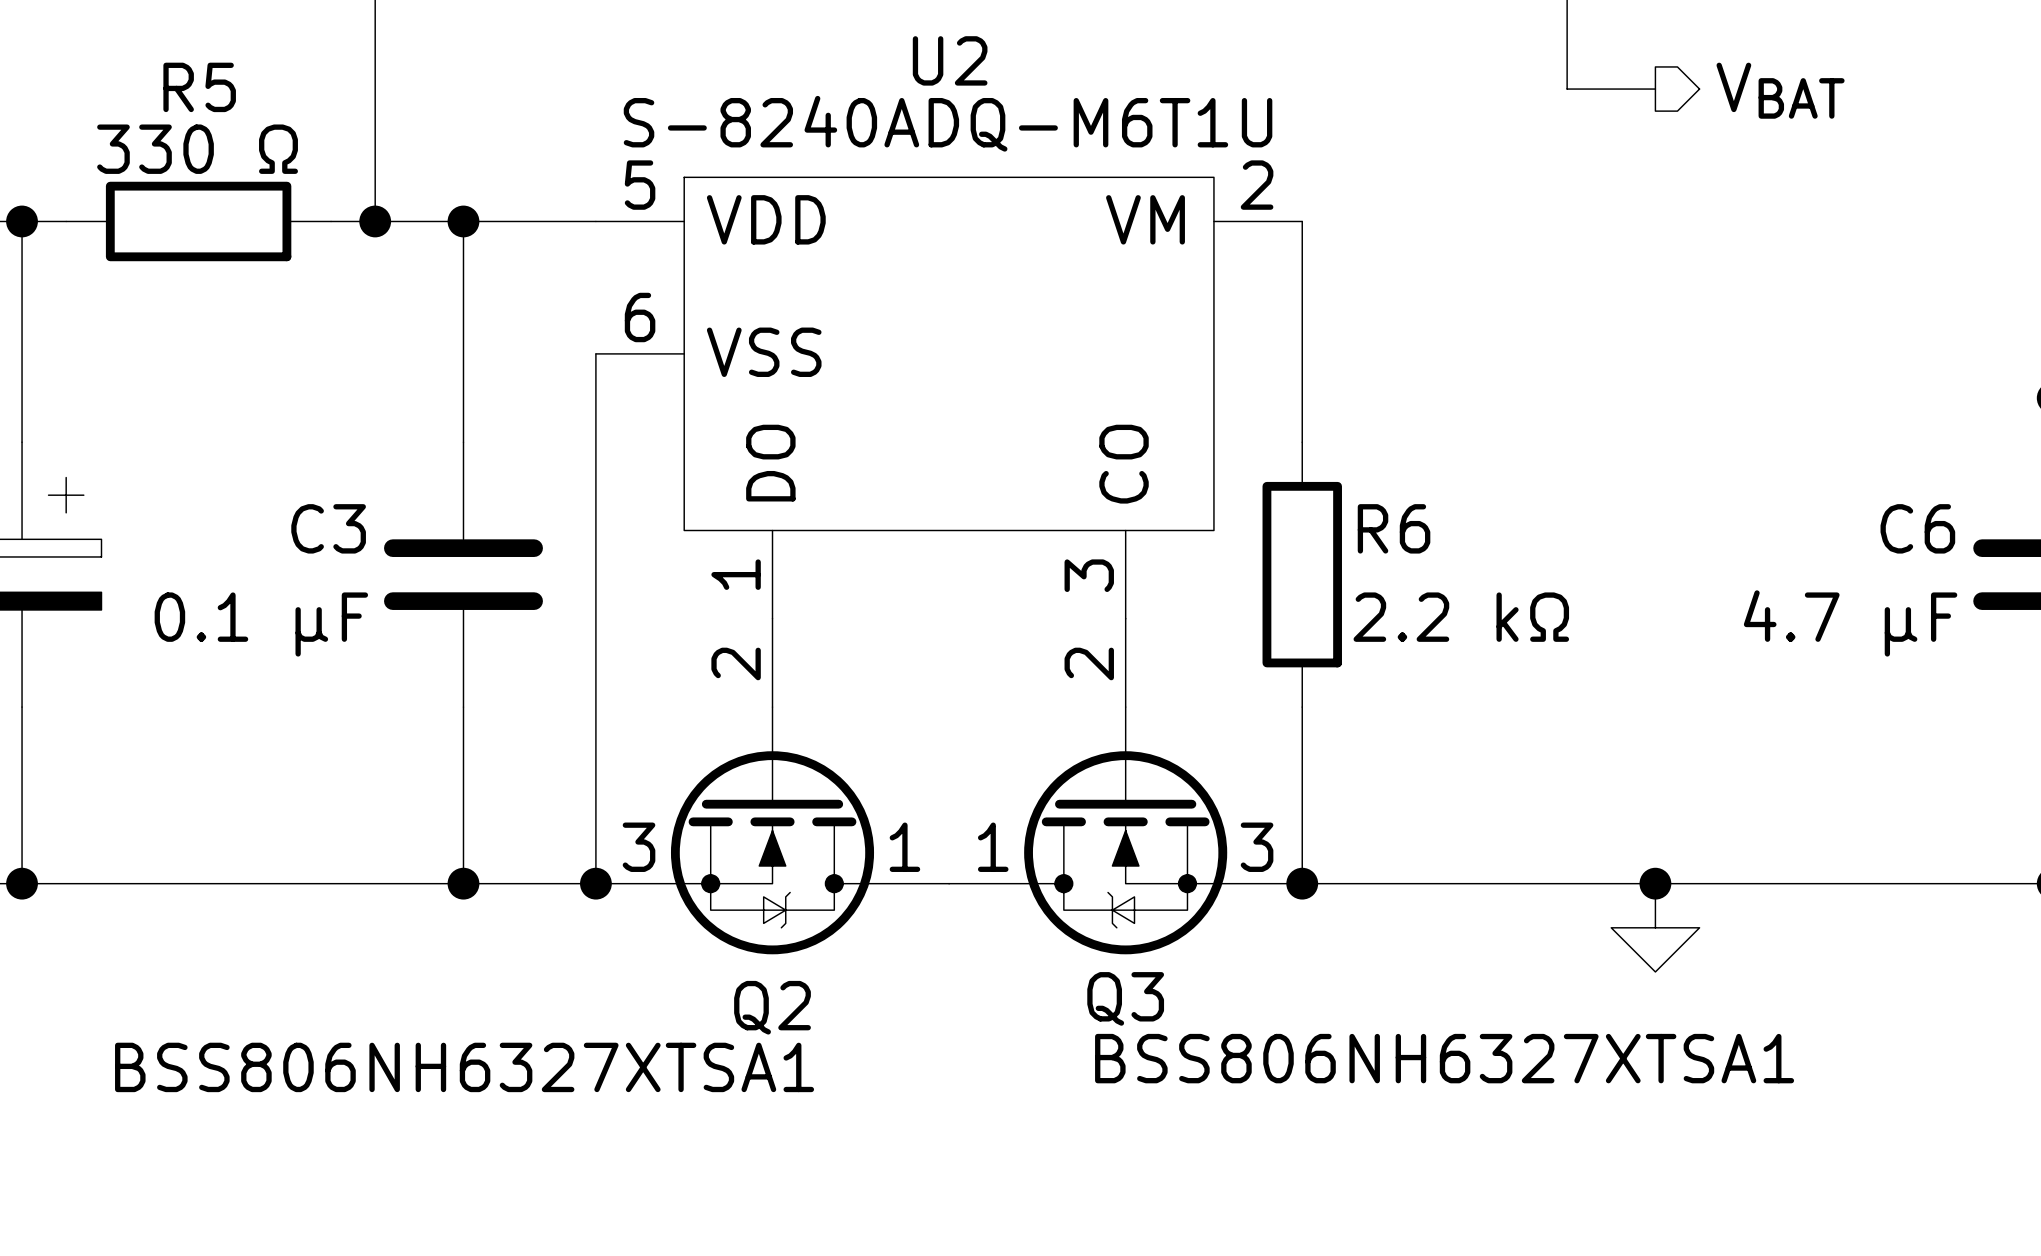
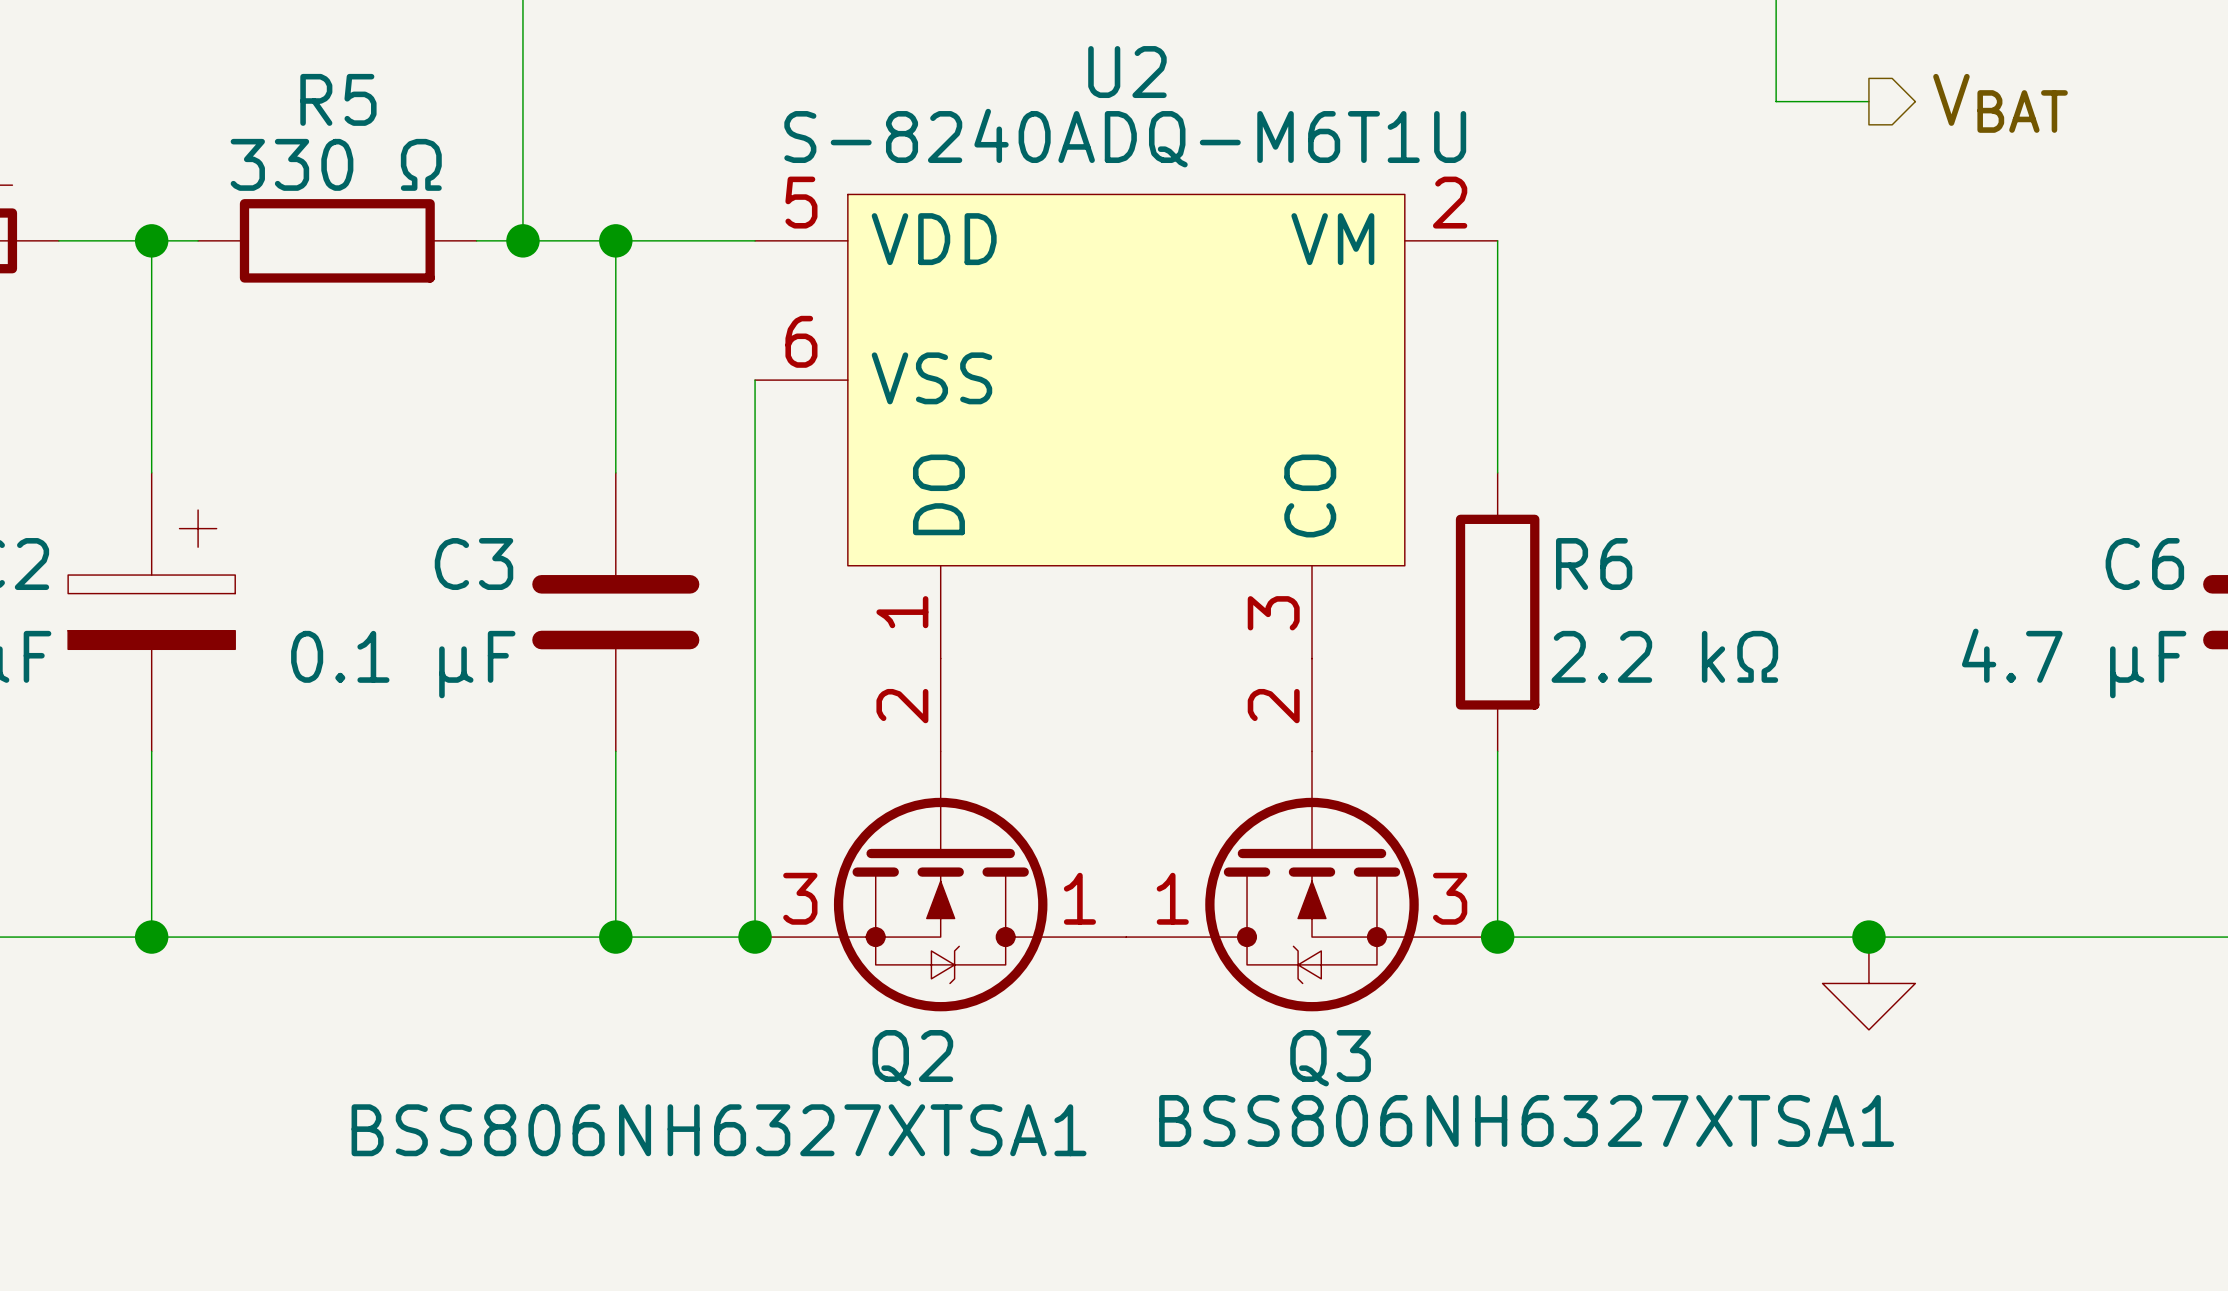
Q3 name position: Q3 (1125, 998) -> Q3 (1330, 1058)
Q2 name position: Q2 (772, 1007) -> Q2 (912, 1058)
Q3 value position: BSS806NH6327XTSA1 (1444, 1058) -> BSS806NH6327XTSA1 (1526, 1120)
Q2 value position: BSS806NH6327XTSA1 (464, 1067) -> BSS806NH6327XTSA1 (719, 1130)

